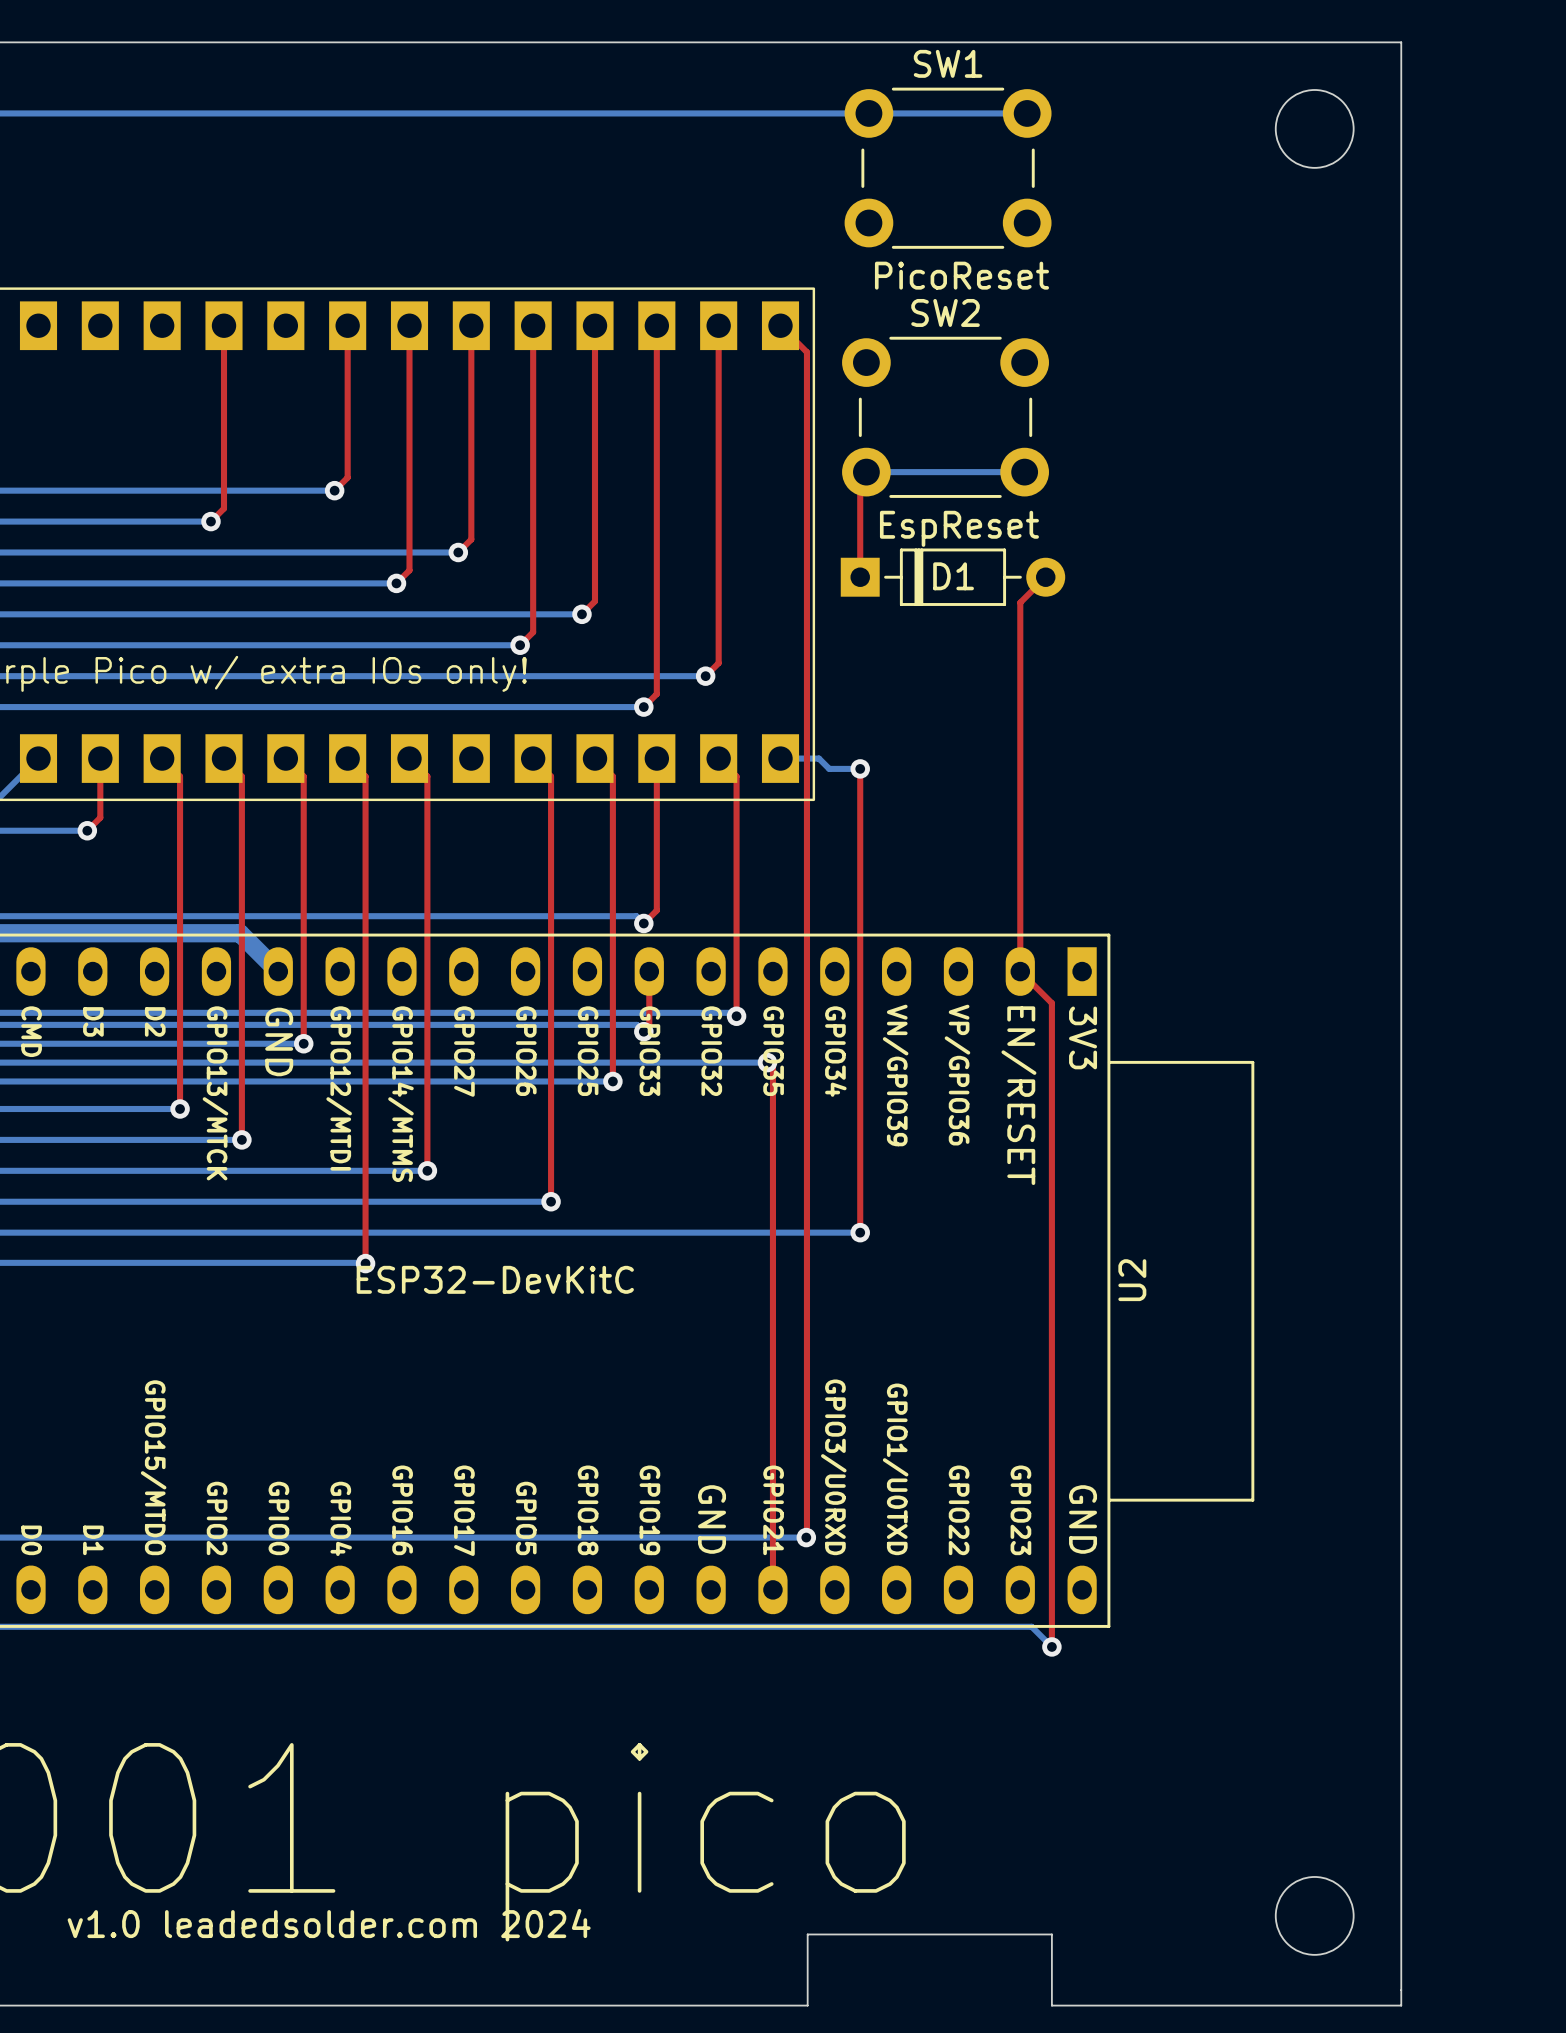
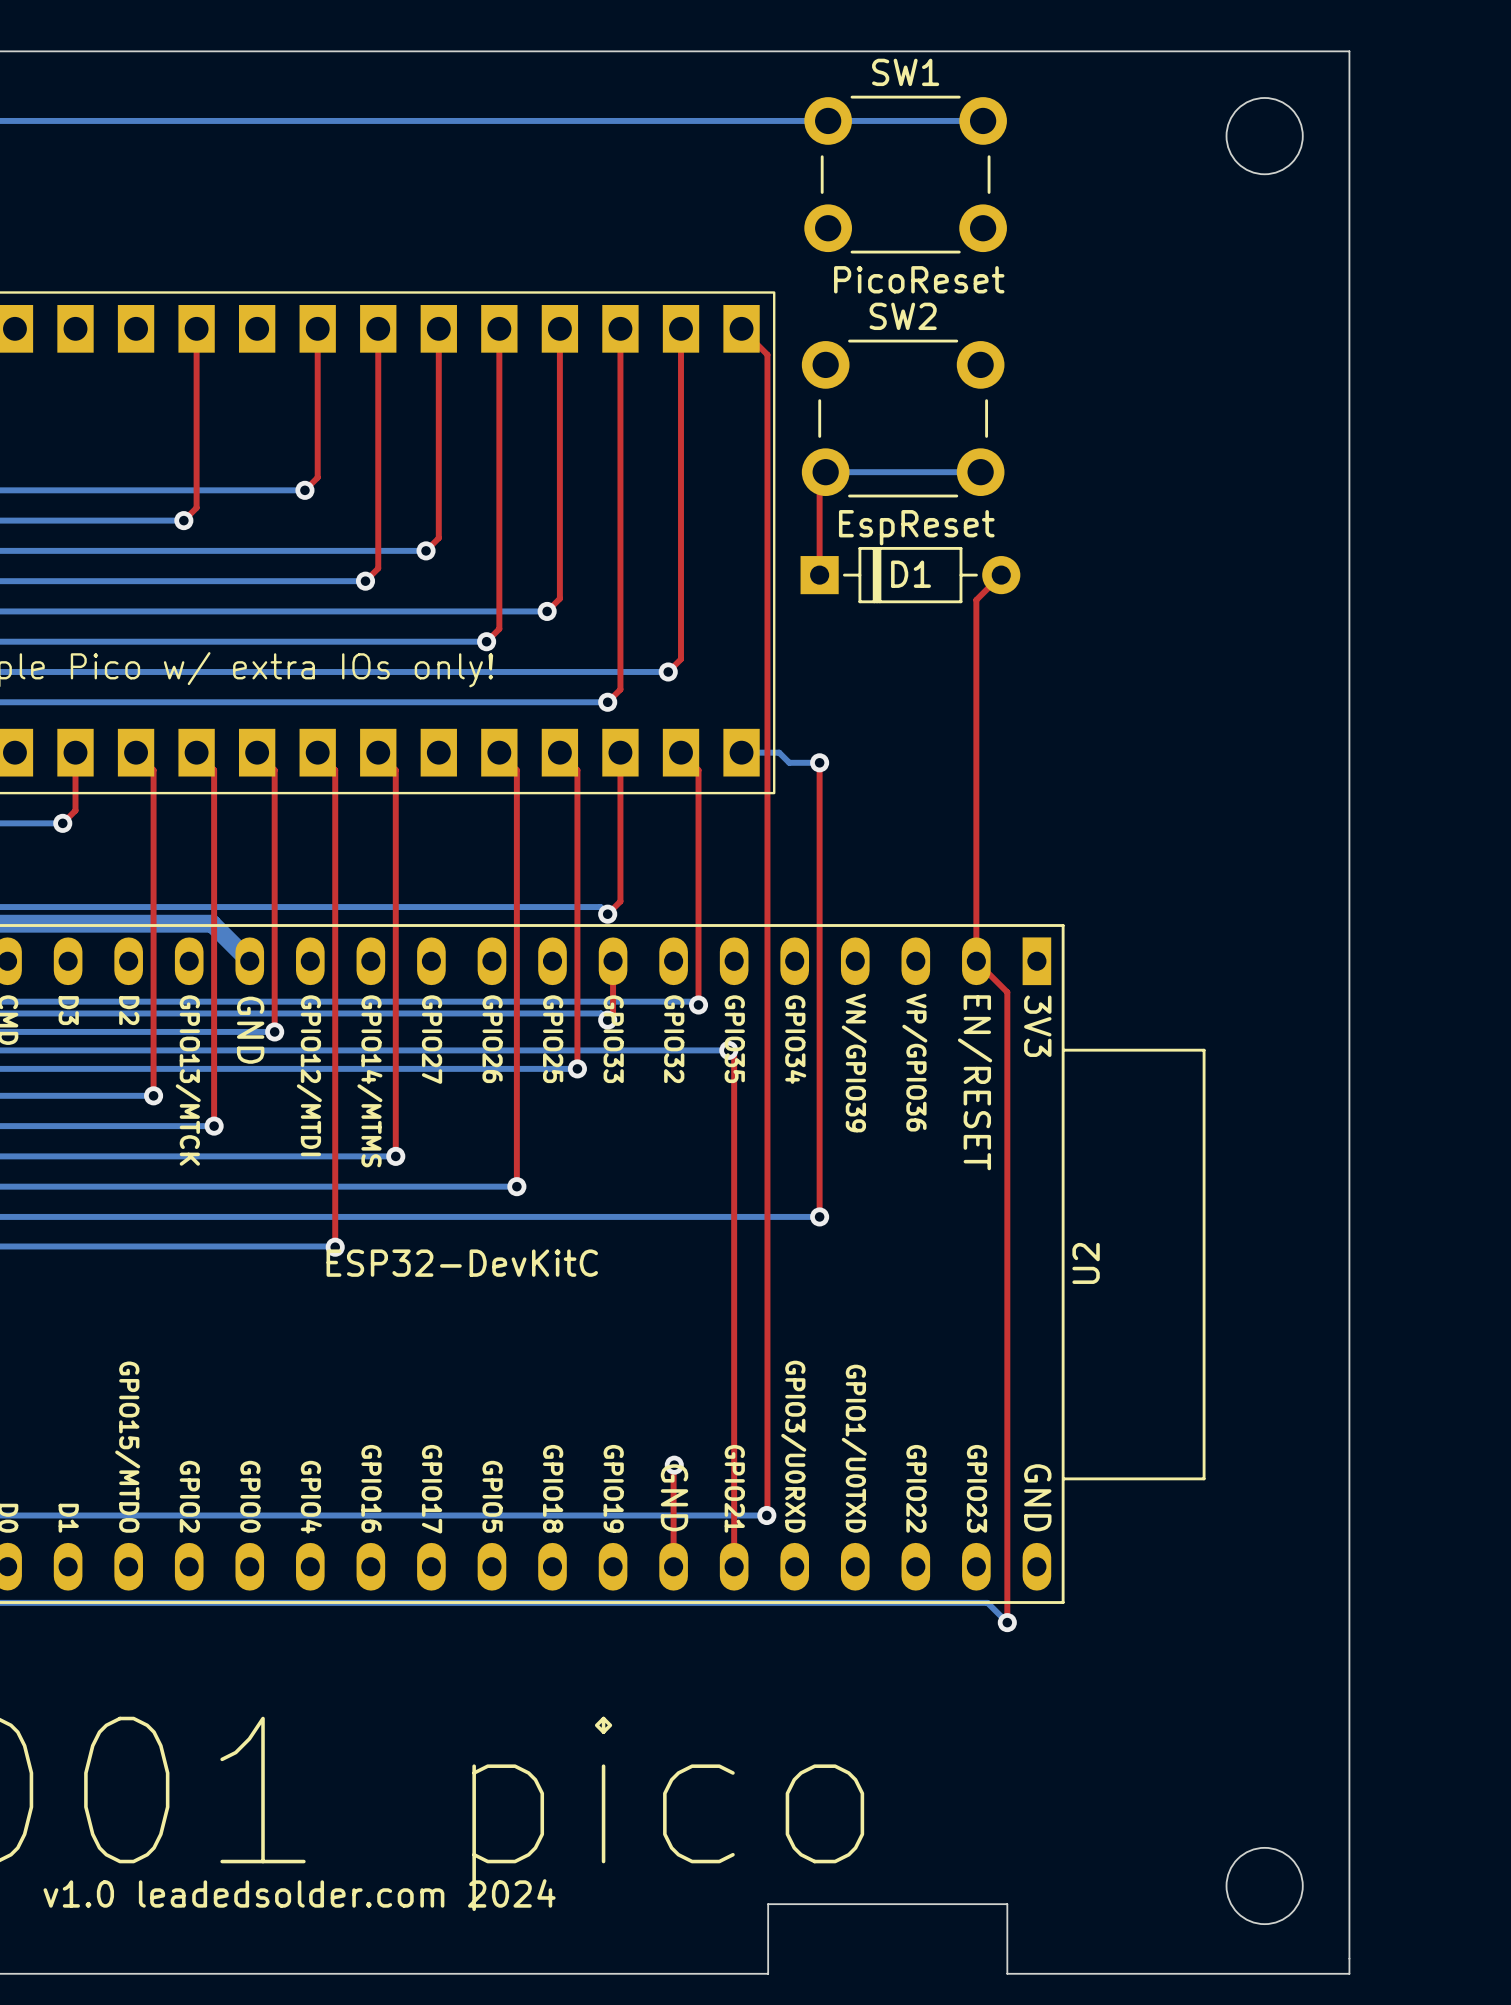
top track: none -> (674, 1465) (673, 1566)
via: none -> (674, 1465)

